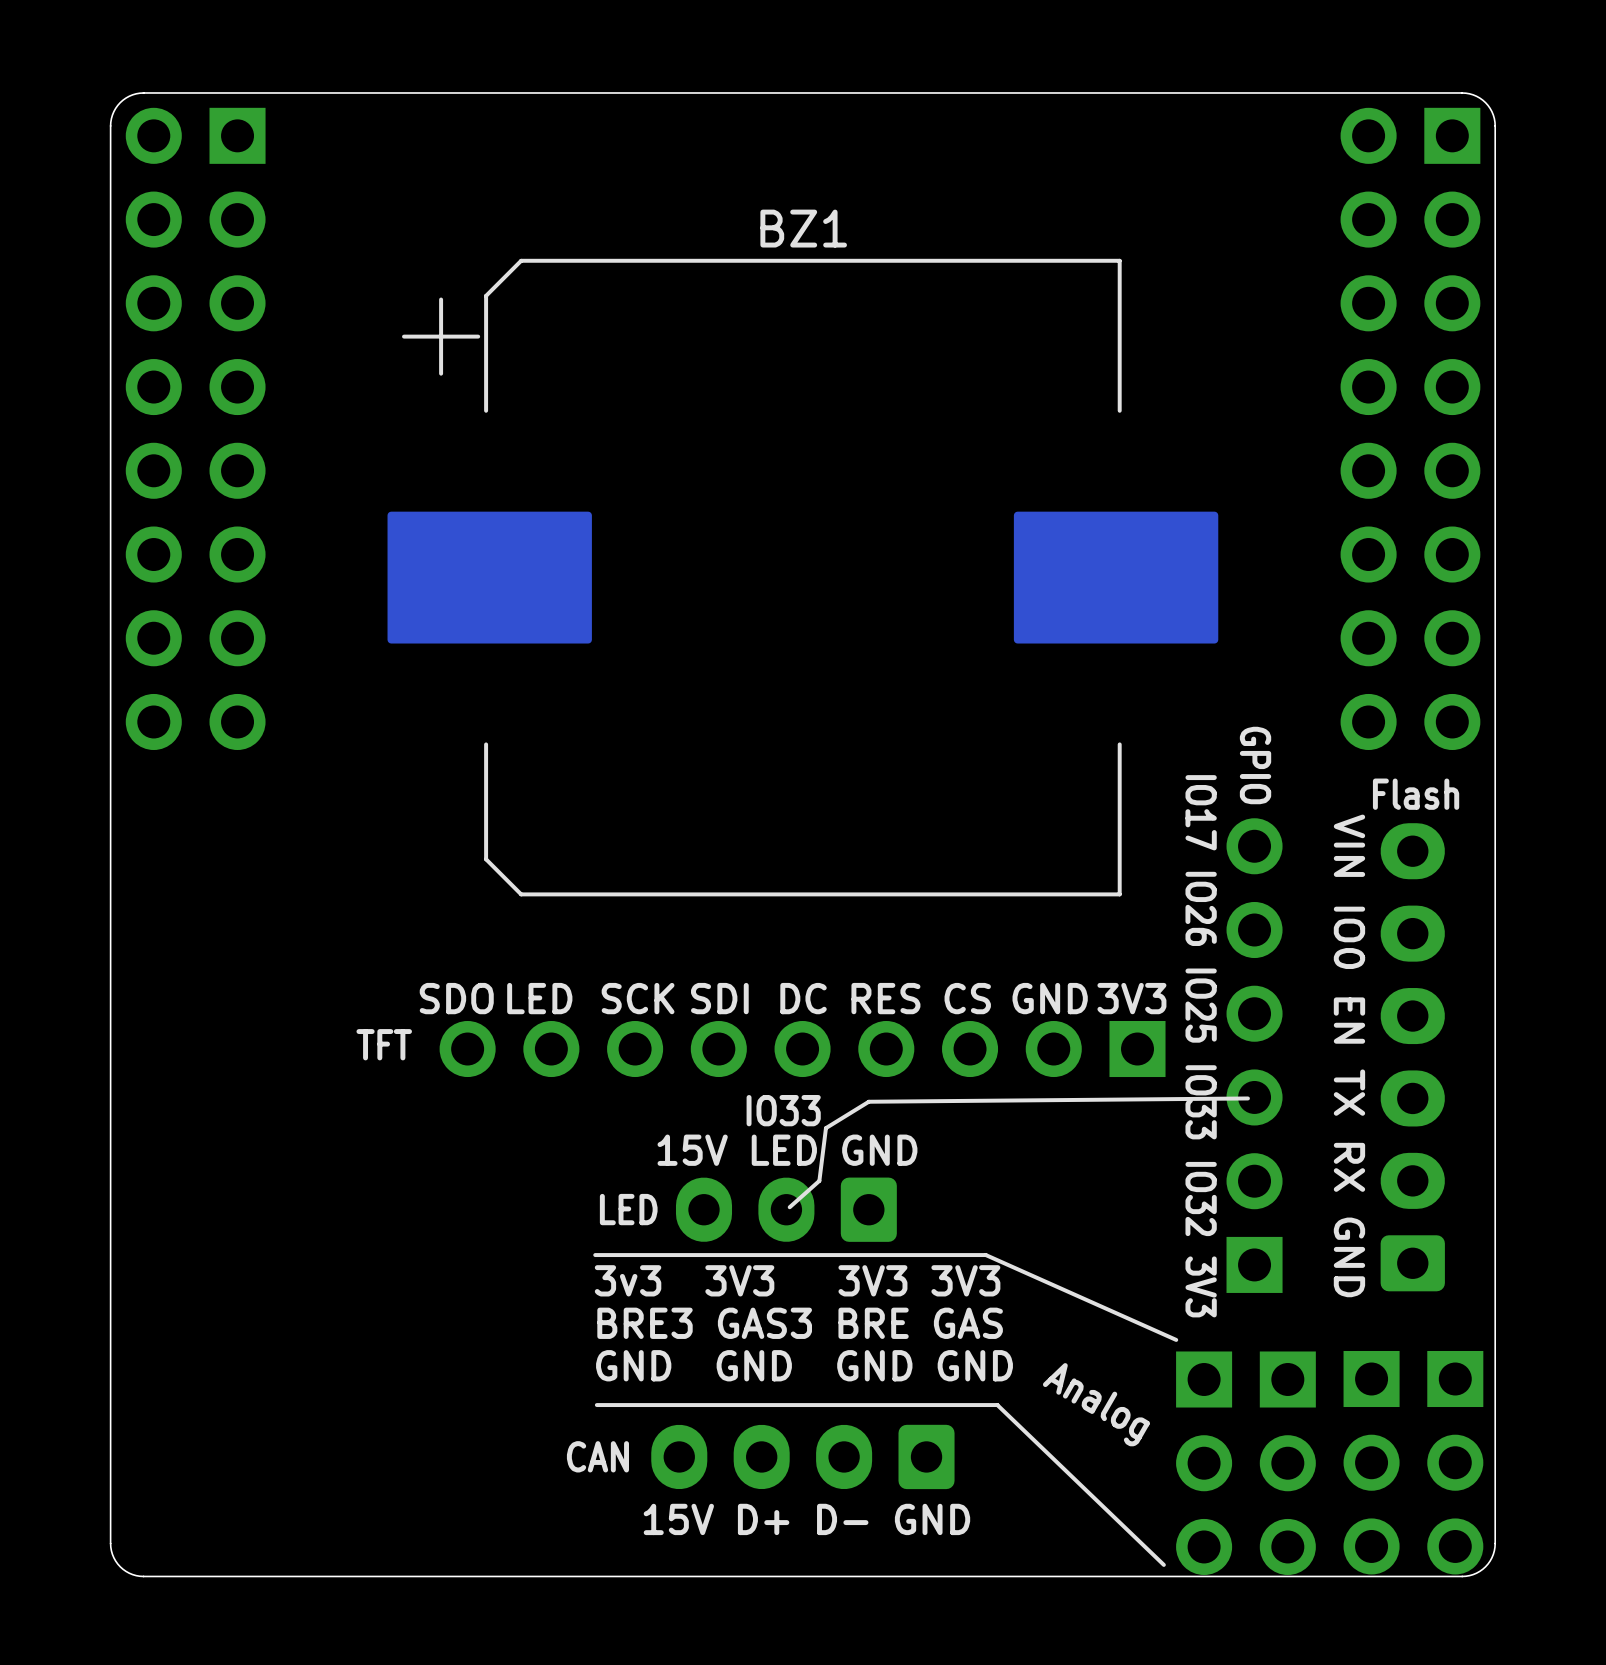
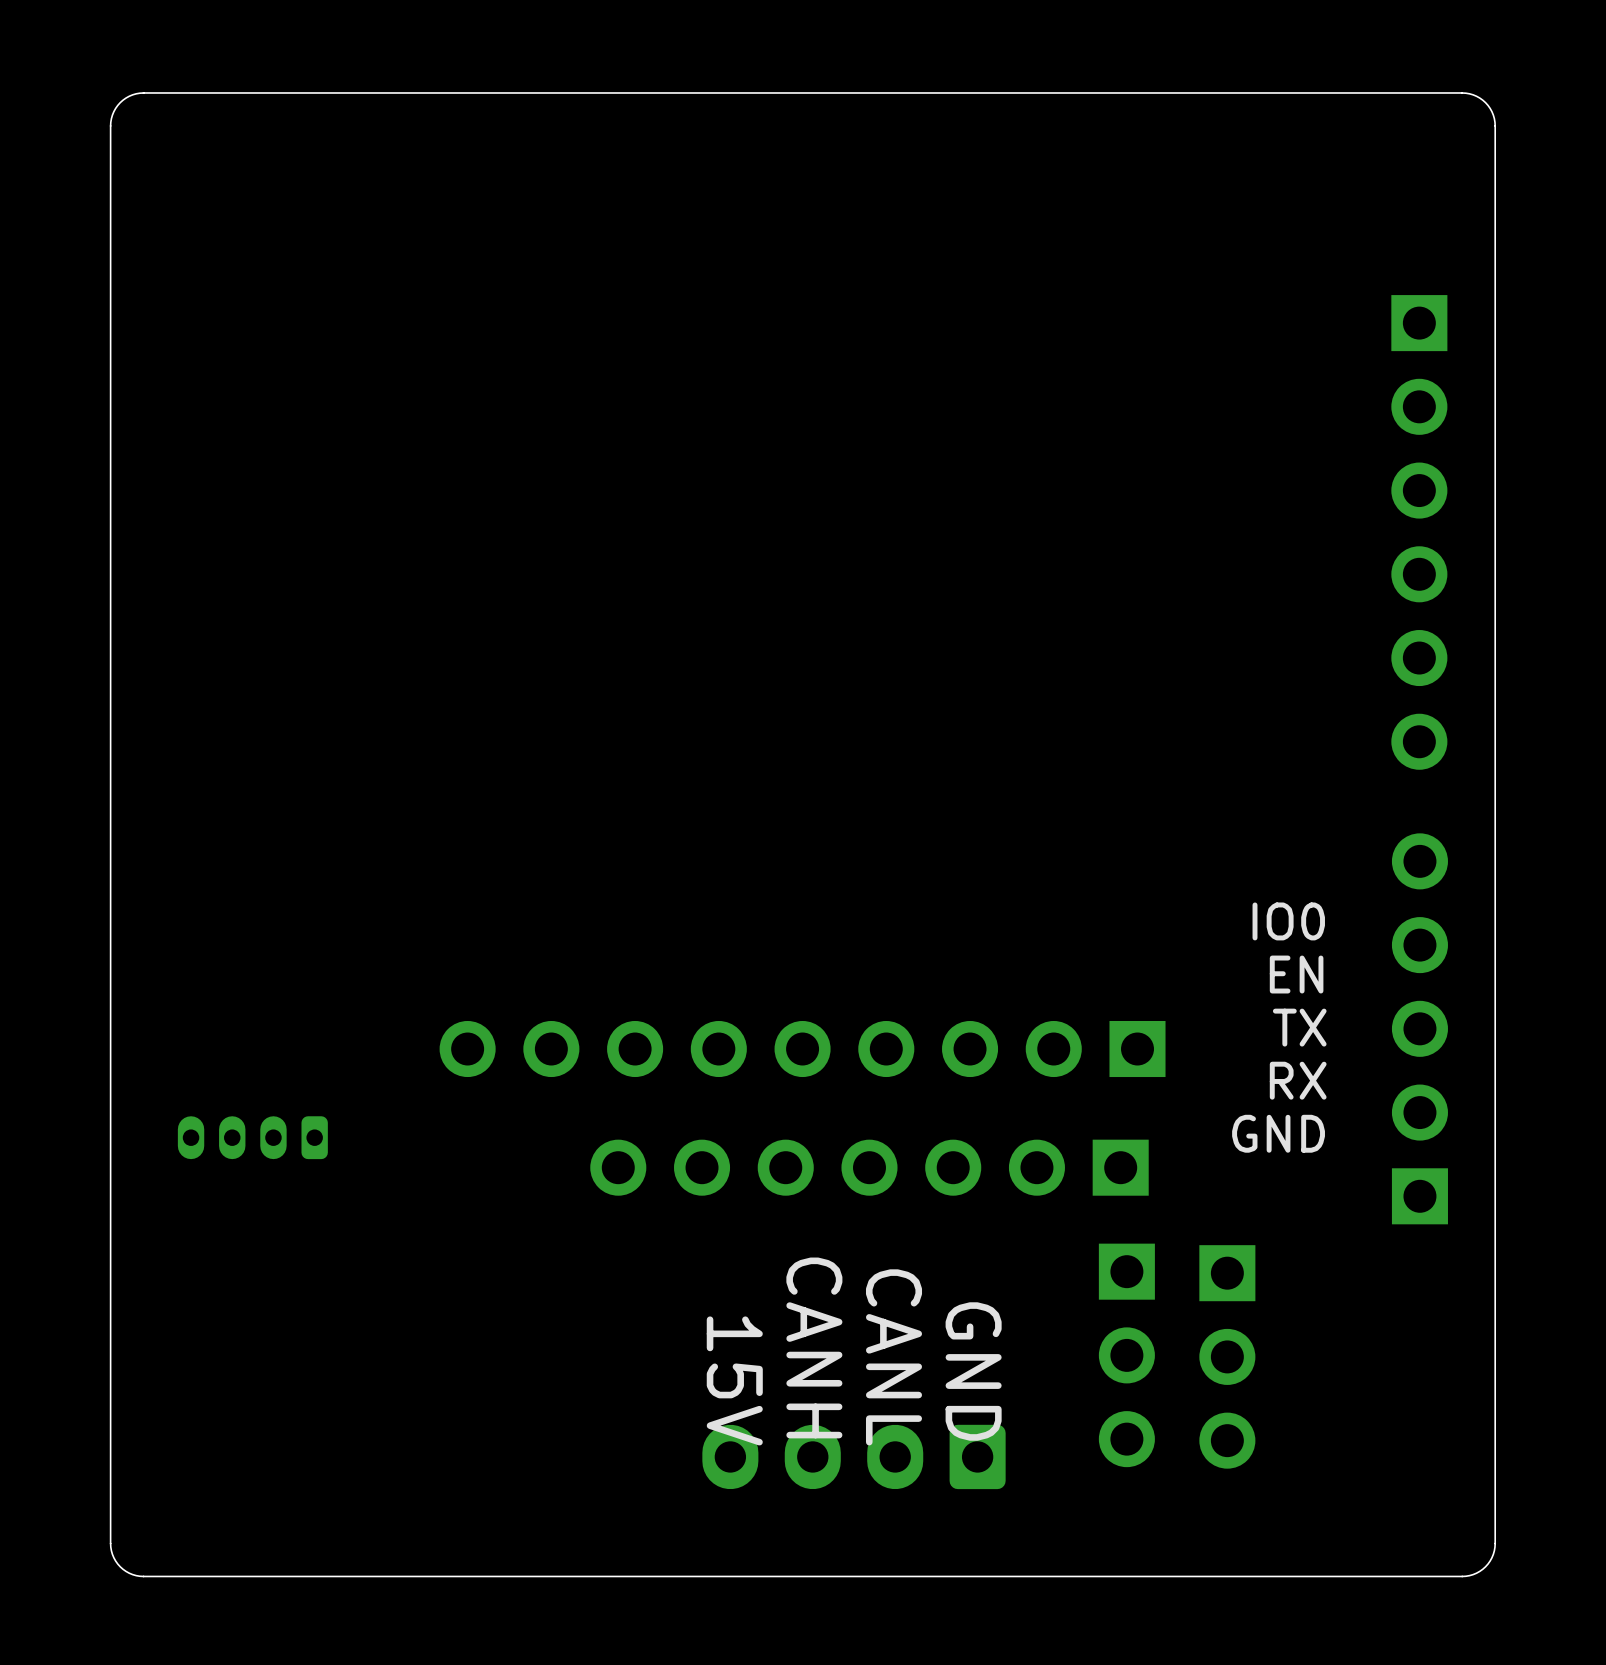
part: (195, 428) -> none
part: (1410, 428) -> none
BZ1: (802, 577) -> none
text: GPIO (1255, 765) -> none
text: Flash (1416, 794) -> none
part footprint: [1380, 823, 1445, 1292] -> [1391, 833, 1448, 1225]
text: none -> IO0 (1288, 921)
text: none -> EN (1296, 974)
text: SDO (456, 998) -> none
text: LED (539, 998) -> none
text: SCK (638, 998) -> none
text: SDI (719, 998) -> none
text: DC (803, 998) -> none
text: RES (885, 998) -> none
text: CS (967, 998) -> none
text: GND (1050, 998) -> none
text: 3V3 (1131, 998) -> none
text: none -> TX (1299, 1027)
text: TFT (384, 1044) -> none
text: IO17 IO26 IO25 IO33 IO32 3V3 (1201, 1046) -> none
part rotation: 0° (1254, 1055) -> 180° (1419, 532)
part position: (1254, 1055) -> (1419, 532)
text: VIN IO0 EN TX RX GND (1349, 1055) -> none
text: none -> RX (1298, 1080)
line: (1247, 1098) (868, 1101) (825, 1128) (819, 1180) (789, 1207) -> none
text: IO33 (783, 1110) -> none
text: none -> GND (1278, 1133)
part: none -> (252, 1137)
text: 15V LED GND (787, 1150) -> none
part: none -> (869, 1167)
text: LED (628, 1209) -> none
part: (786, 1209) -> none
line: (595, 1255) (985, 1255) (1176, 1339) -> none
text: 3v3 3V3 3V3 3V3 (797, 1280) -> none
text: BRE3 GAS3 BRE GAS (800, 1323) -> none
text: none -> CANH (814, 1347)
part: none -> (1126, 1355)
part: none -> (1227, 1356)
text: none -> CANL (894, 1357)
text: GND GND GND GND (804, 1365) -> none
text: none -> GND (973, 1371)
text: none -> 15V (734, 1380)
text: Analog (1096, 1404) -> none
line: (596, 1405) (997, 1405) (1163, 1564) -> none
text: CAN (597, 1456) -> none
part position: (802, 1456) -> (853, 1456)
part: (1371, 1462) -> none
part: (1455, 1462) -> none
part: (1204, 1463) -> none
part: (1287, 1463) -> none
text: 15V D+ D- GND (806, 1519) -> none

